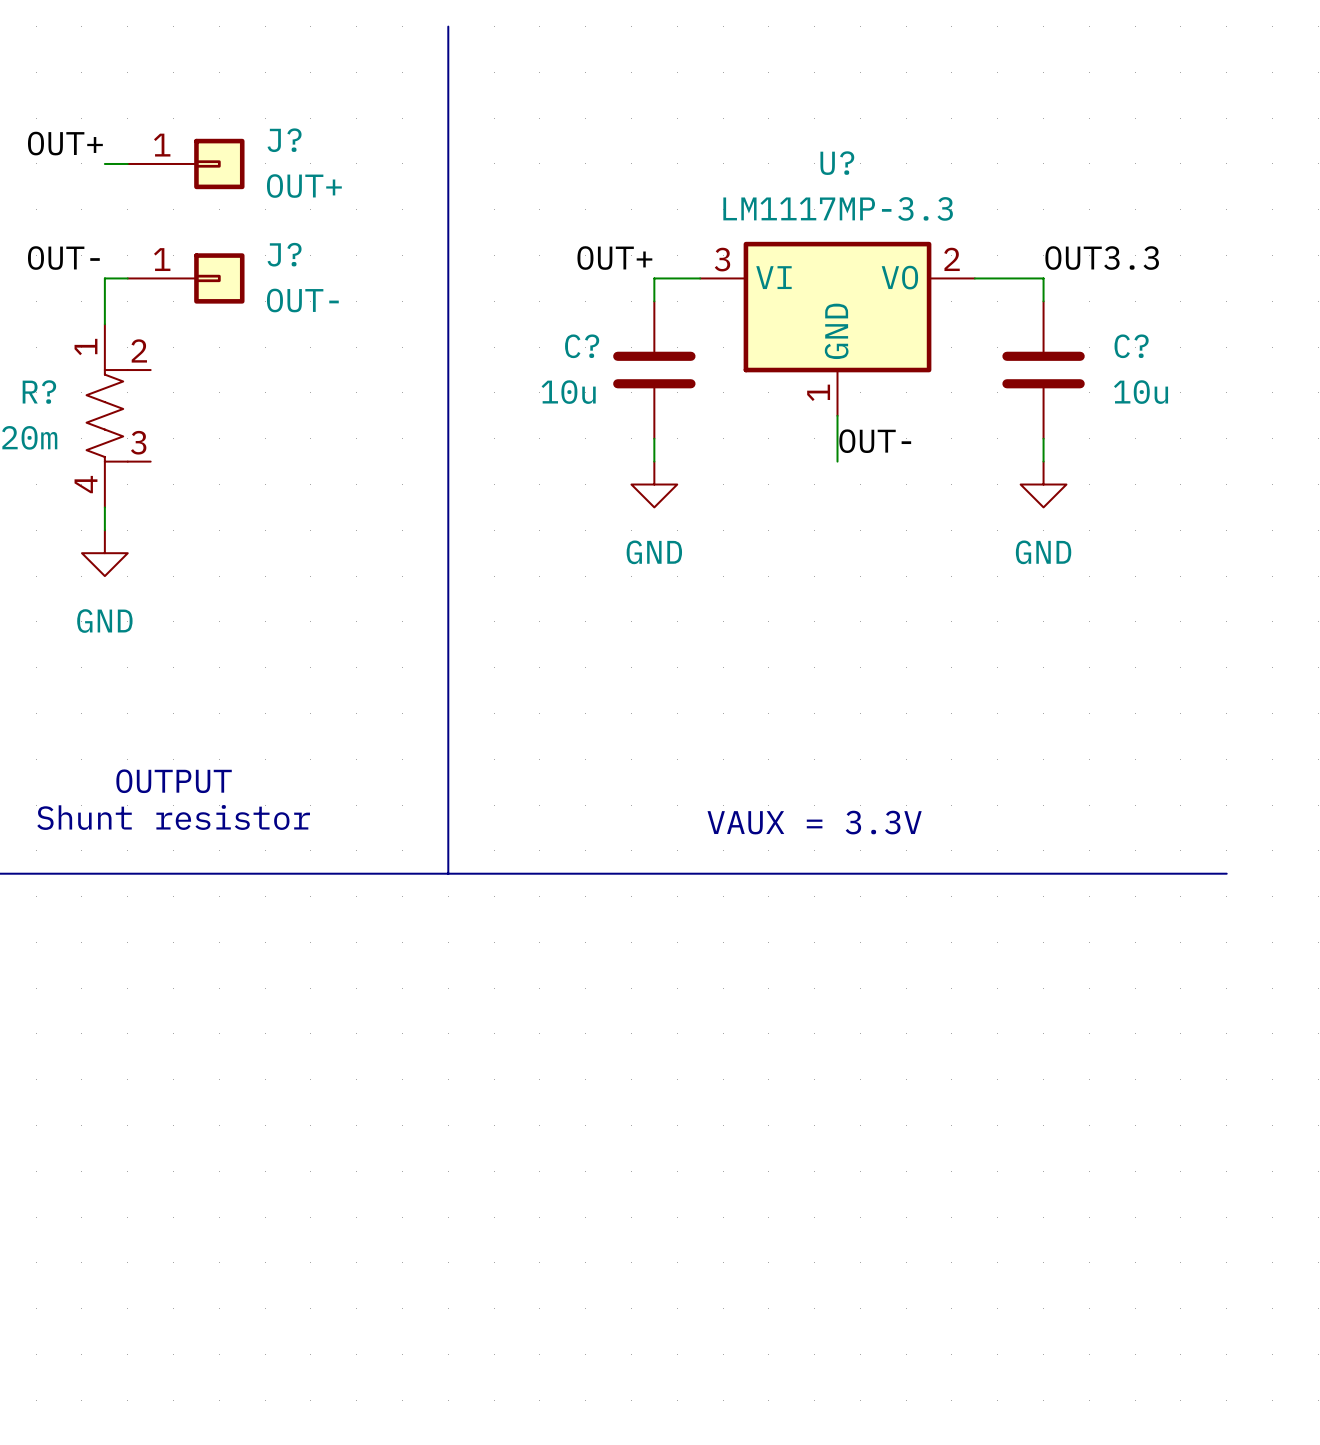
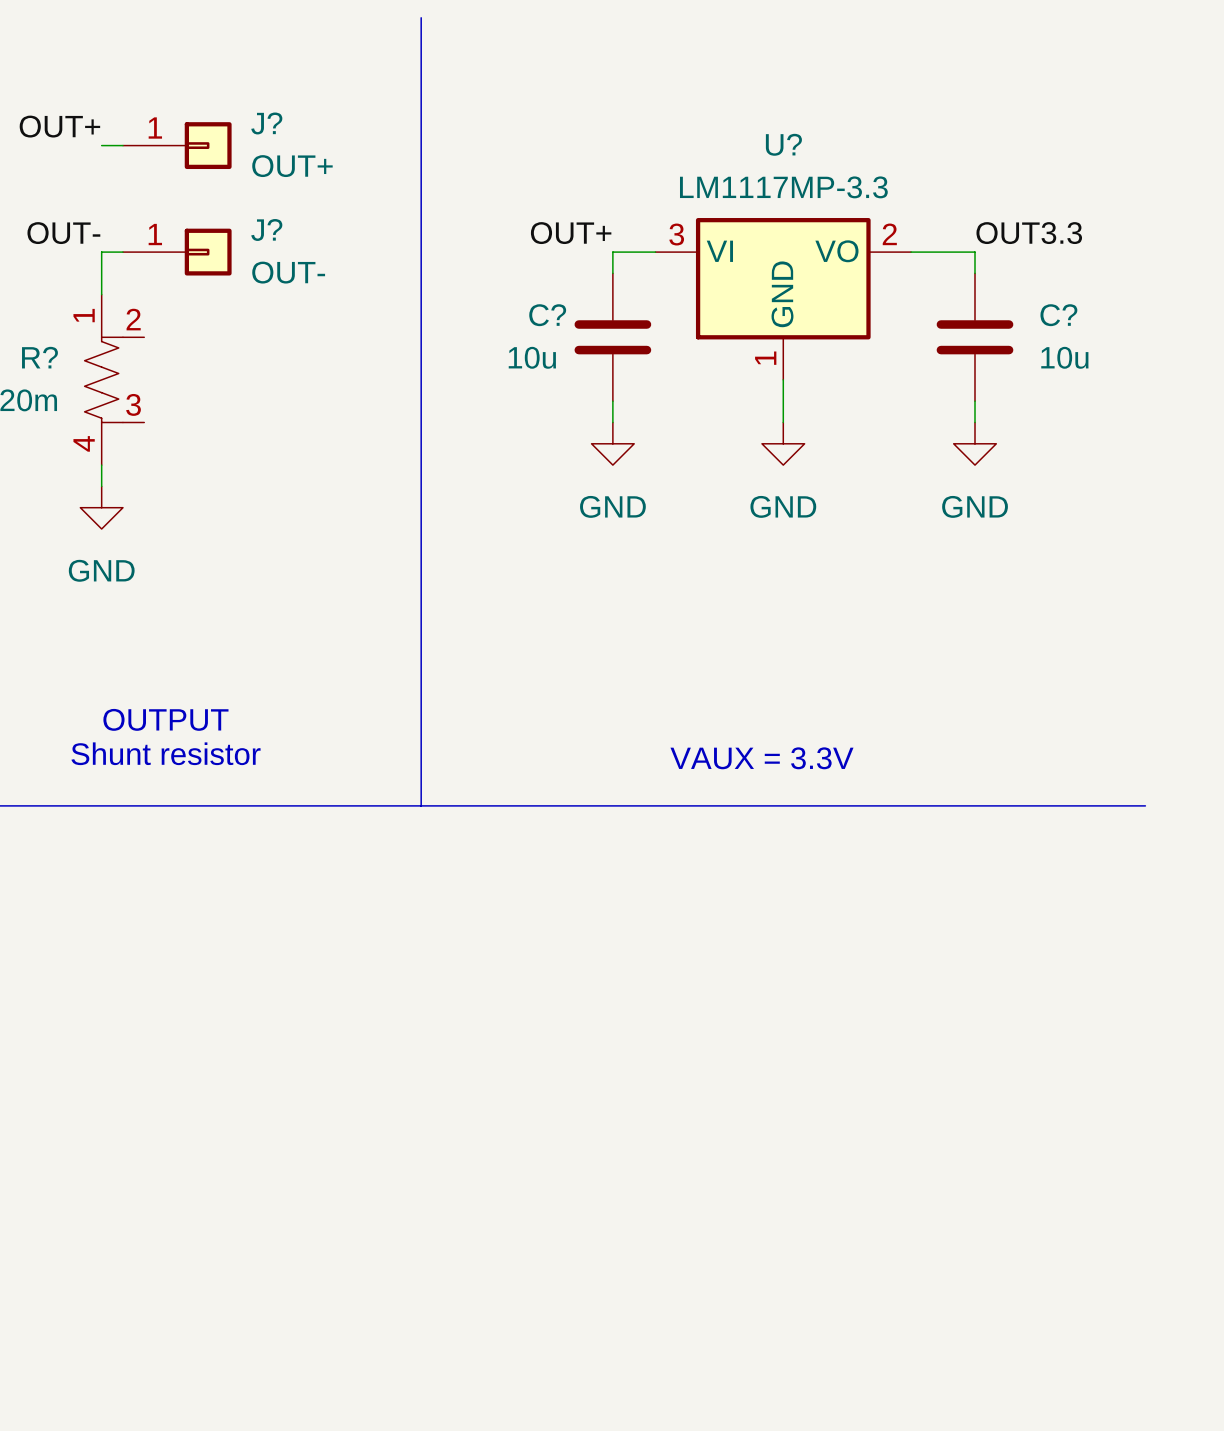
label: OUT- (875, 441) -> none
power symbol: none -> GND (783, 443)

